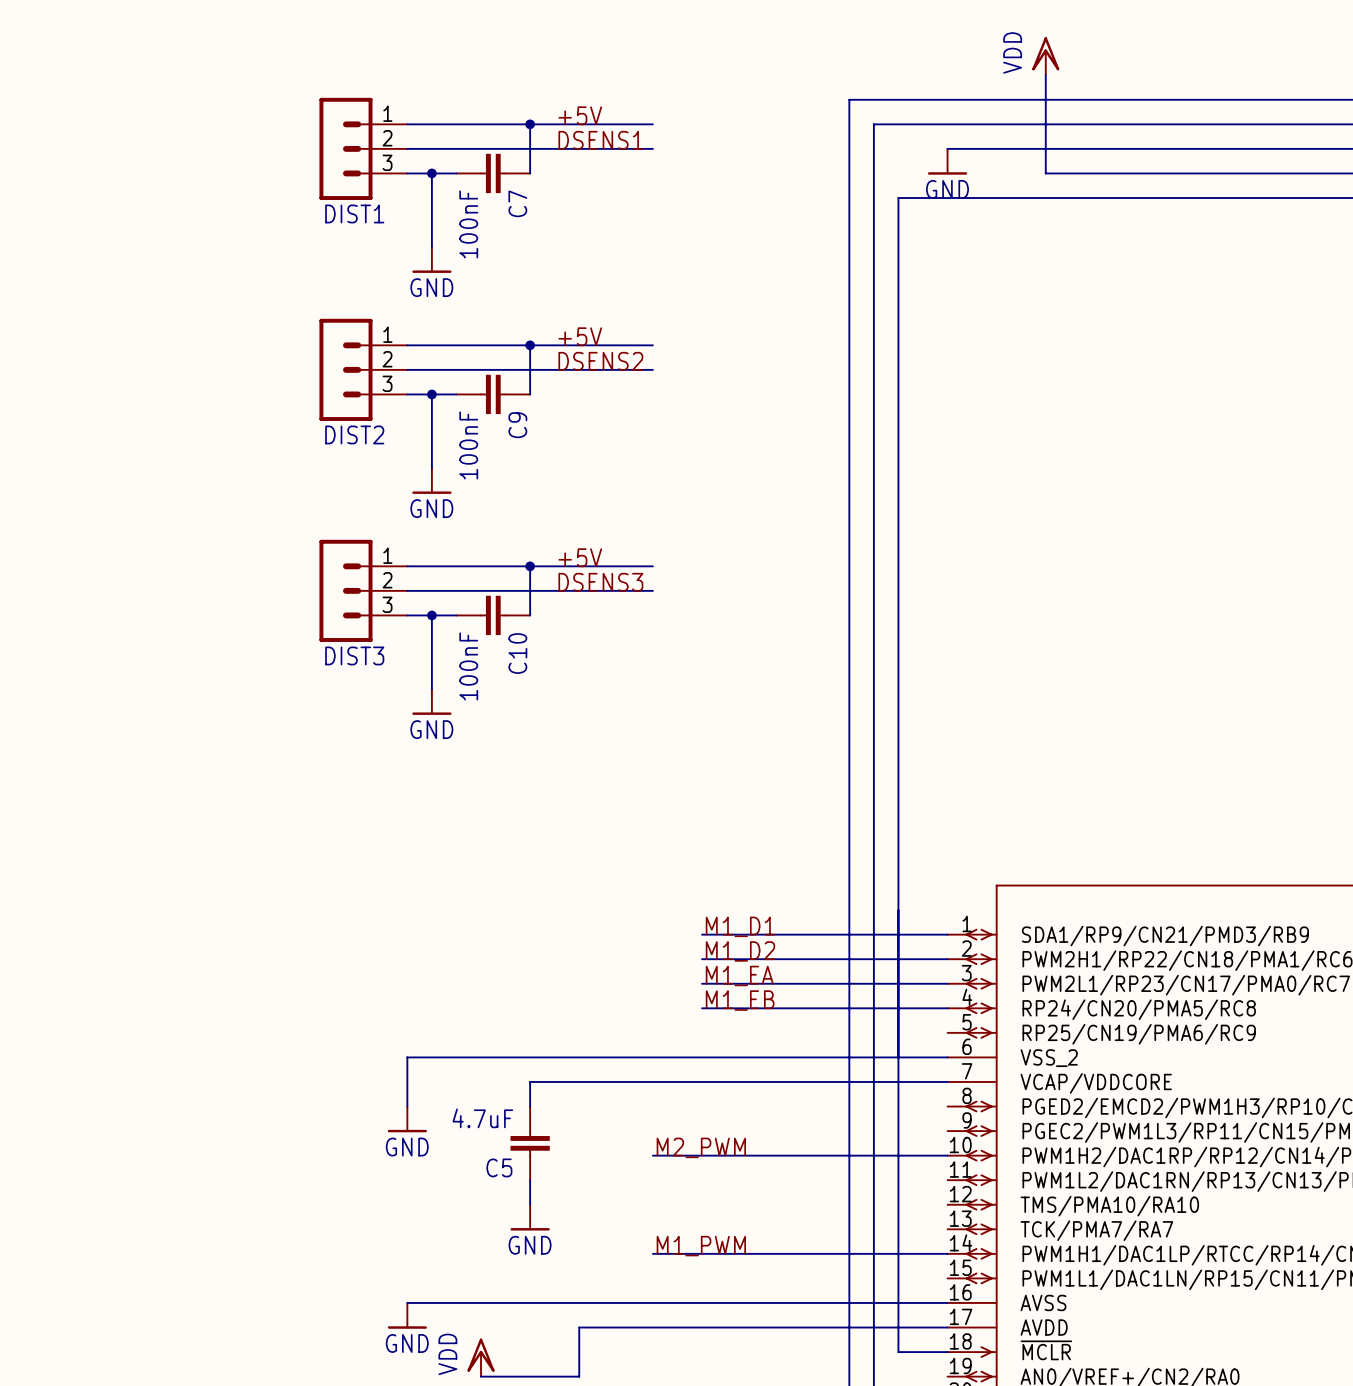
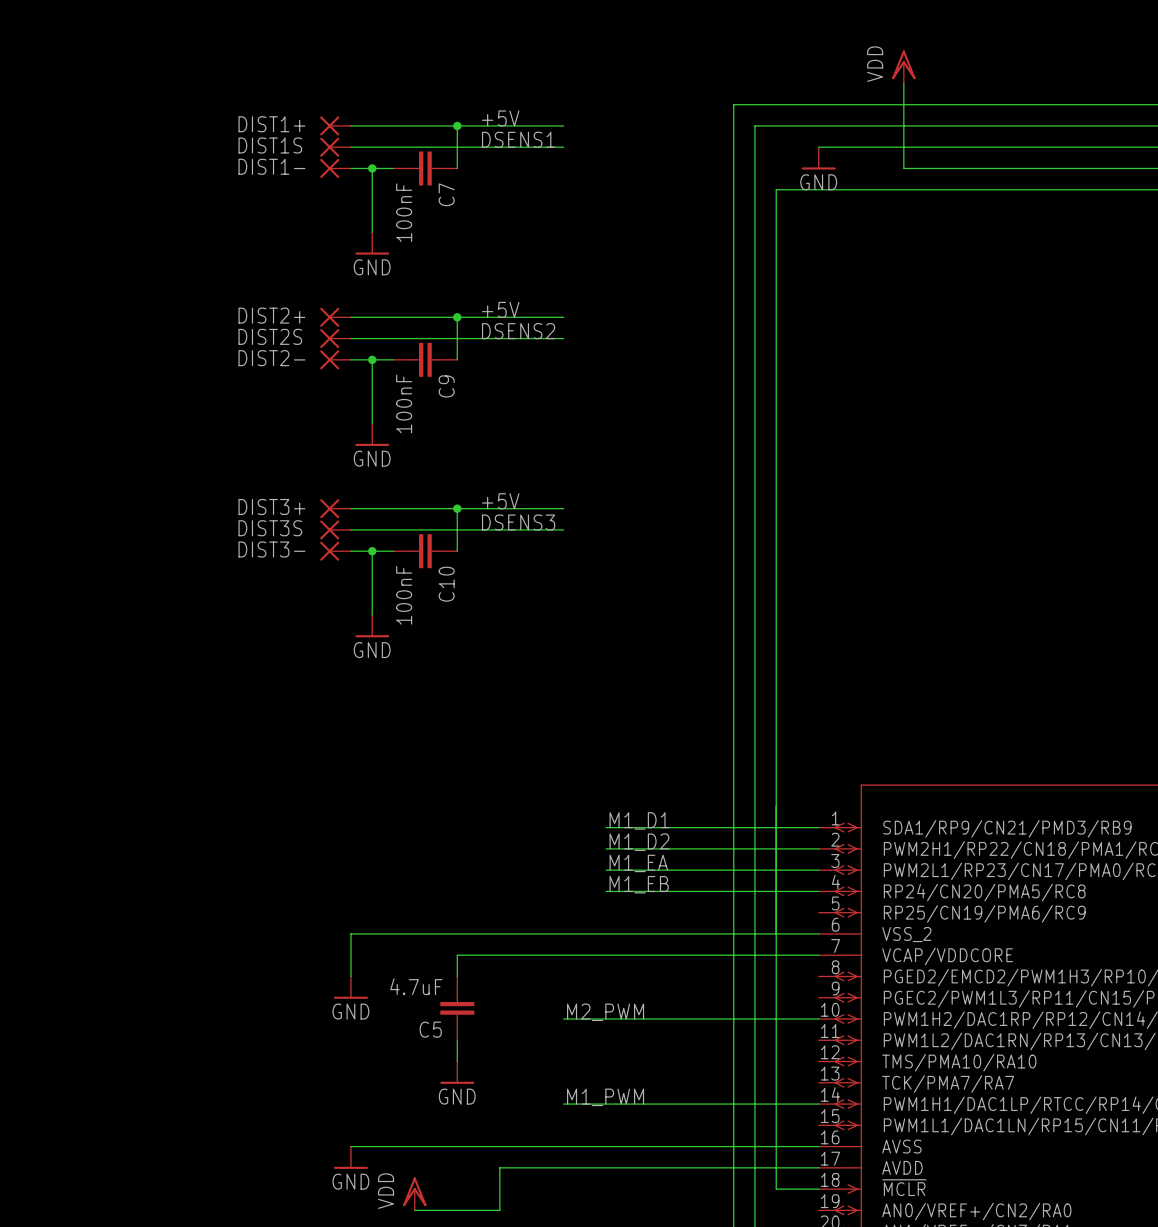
DIST1+: none -> (335, 125)
DIST1: (363, 148) -> none
DIST1S: none -> (335, 147)
DIST1-: none -> (335, 168)
DIST2+: none -> (335, 317)
DIST2: (363, 369) -> none
DIST2S: none -> (335, 338)
DIST2-: none -> (335, 359)
DIST3+: none -> (335, 508)
DIST3: (363, 590) -> none
DIST3S: none -> (335, 529)
DIST3-: none -> (335, 551)

